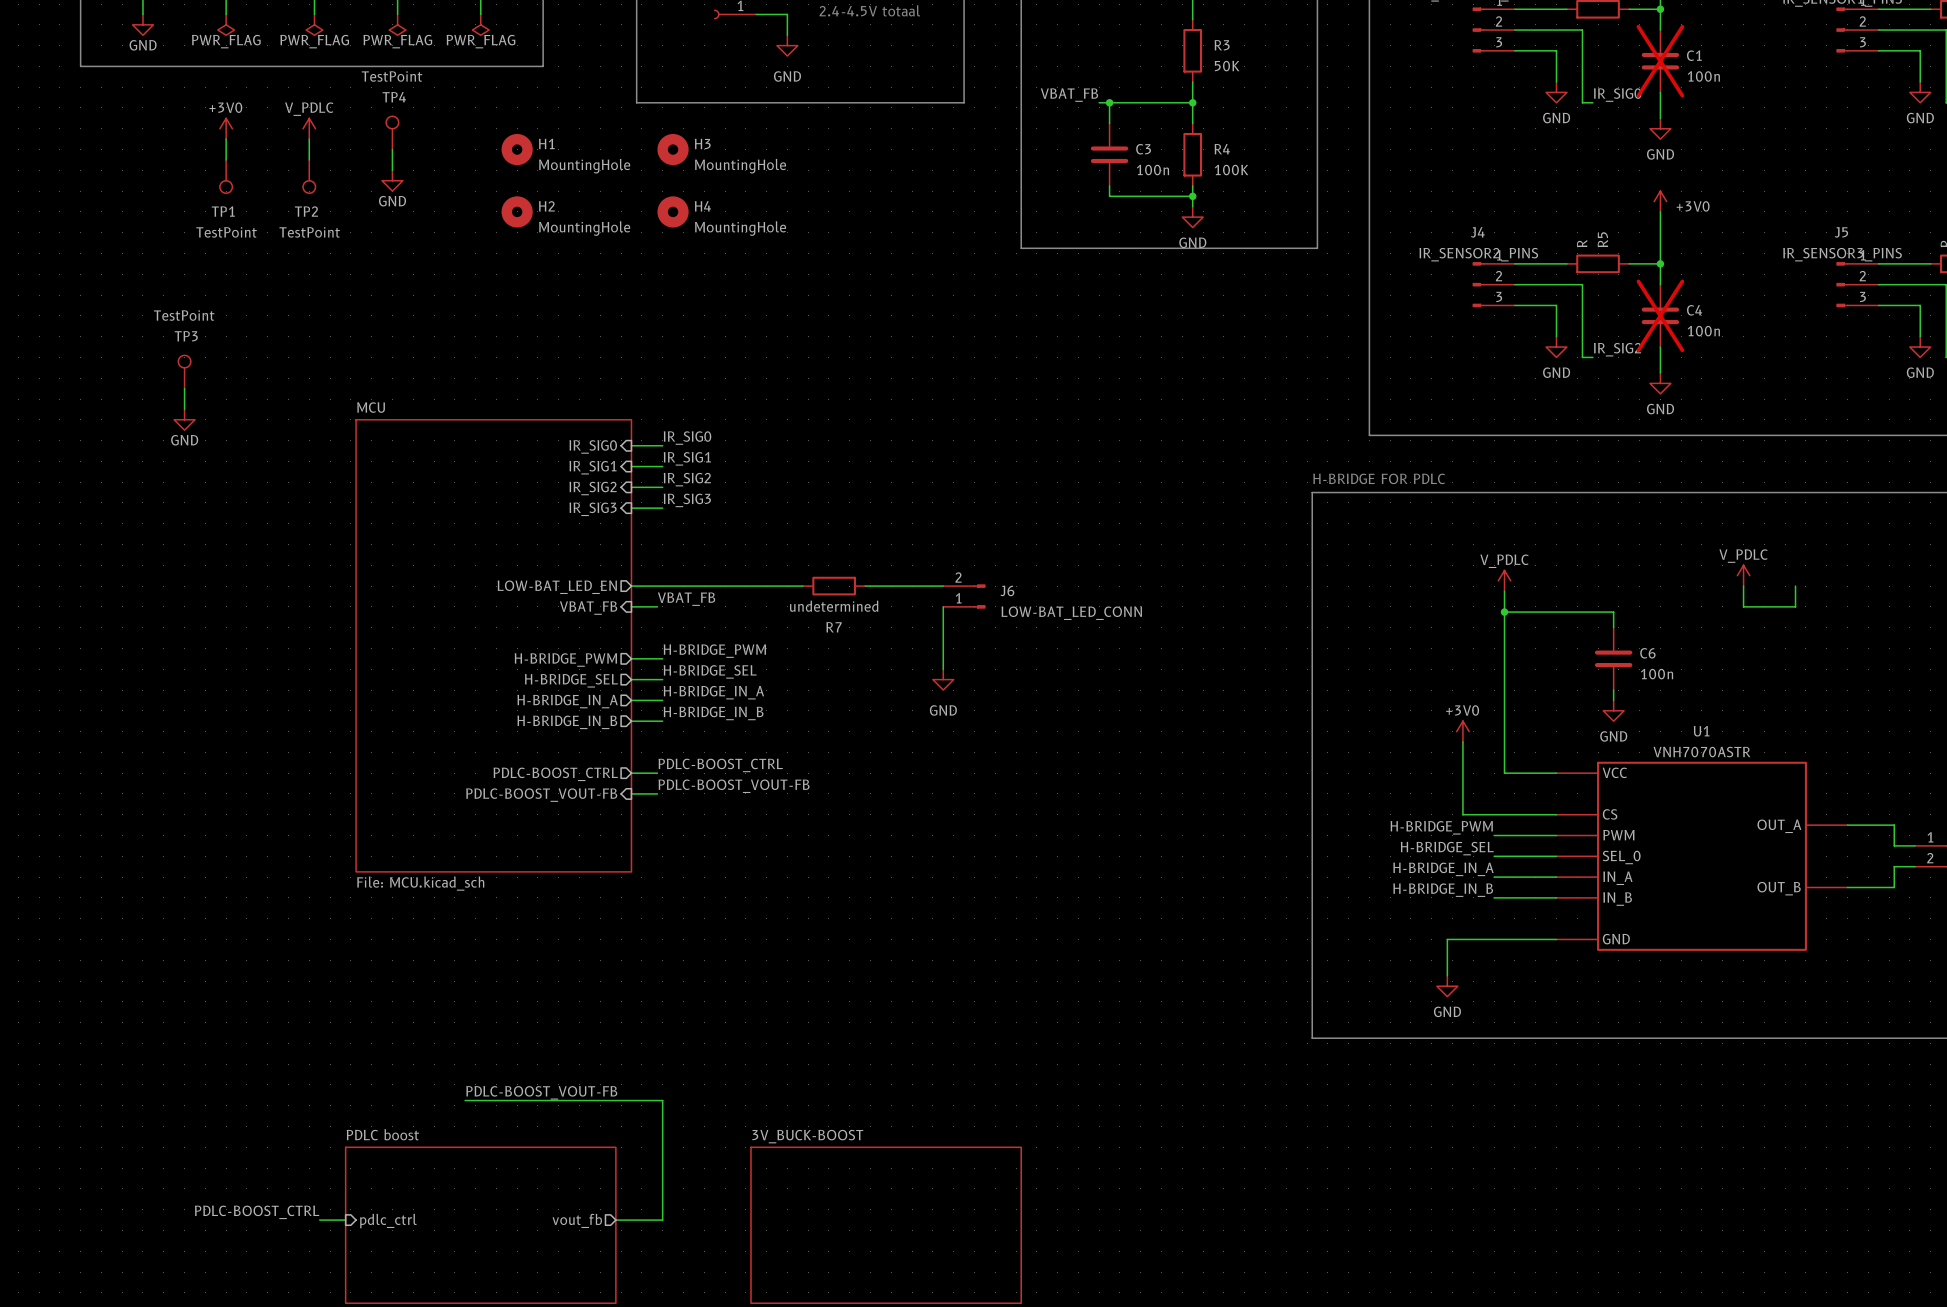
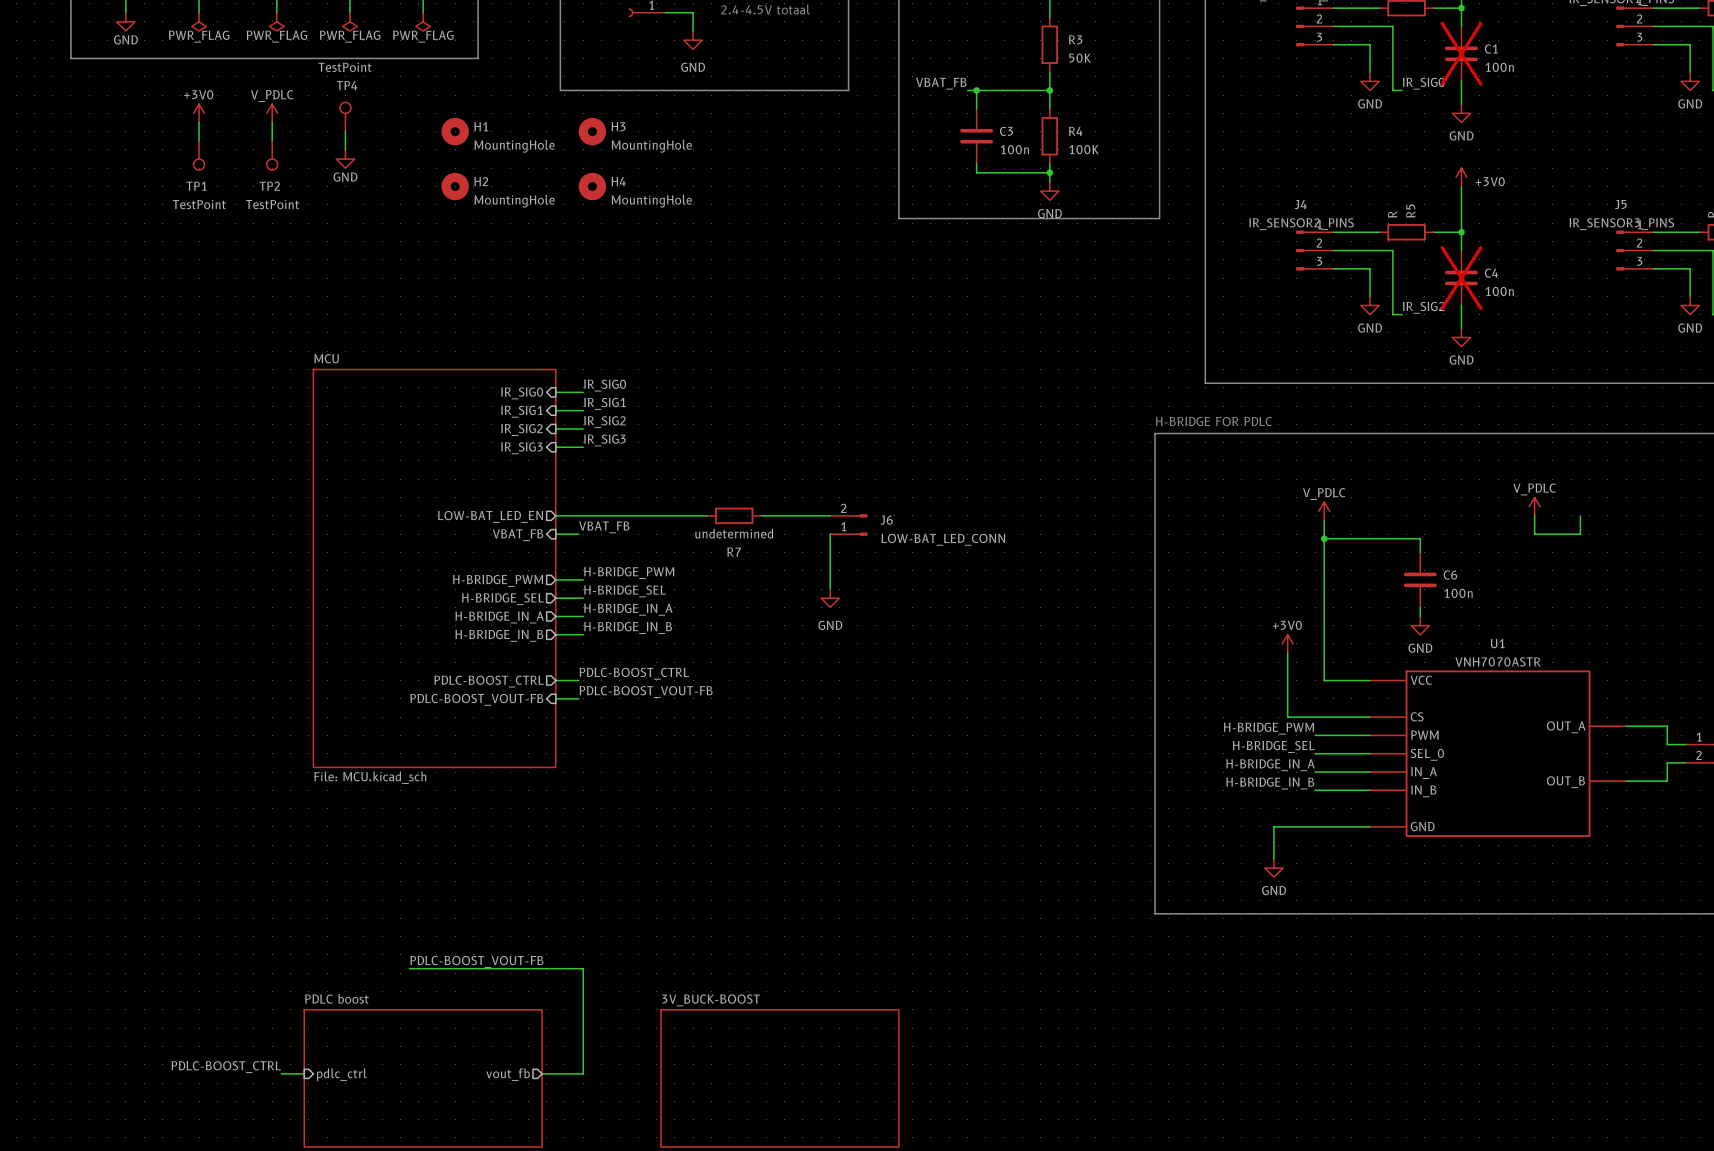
TP3: TestPoint (184, 371) -> none
wire: (184, 388) (184, 409) -> none
power symbol: GND (184, 419) -> none

